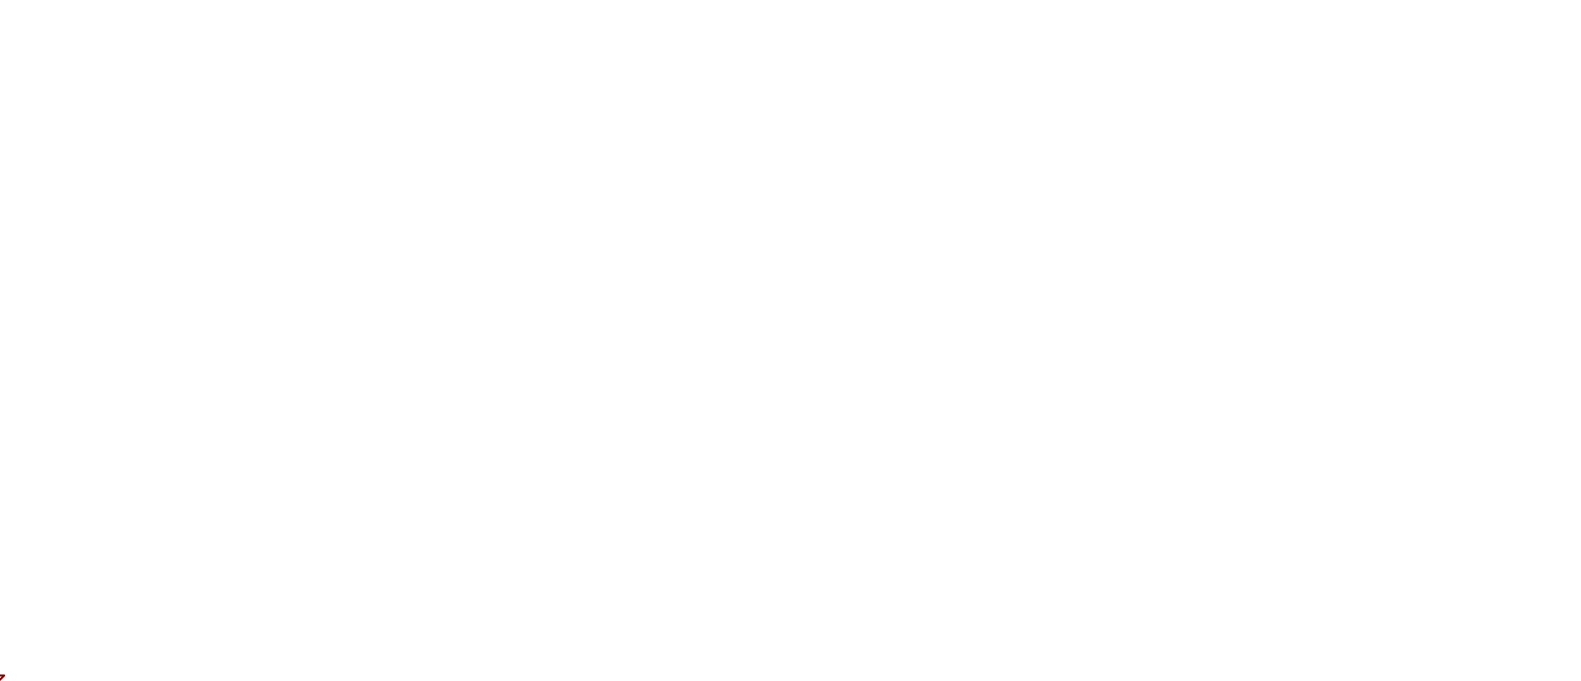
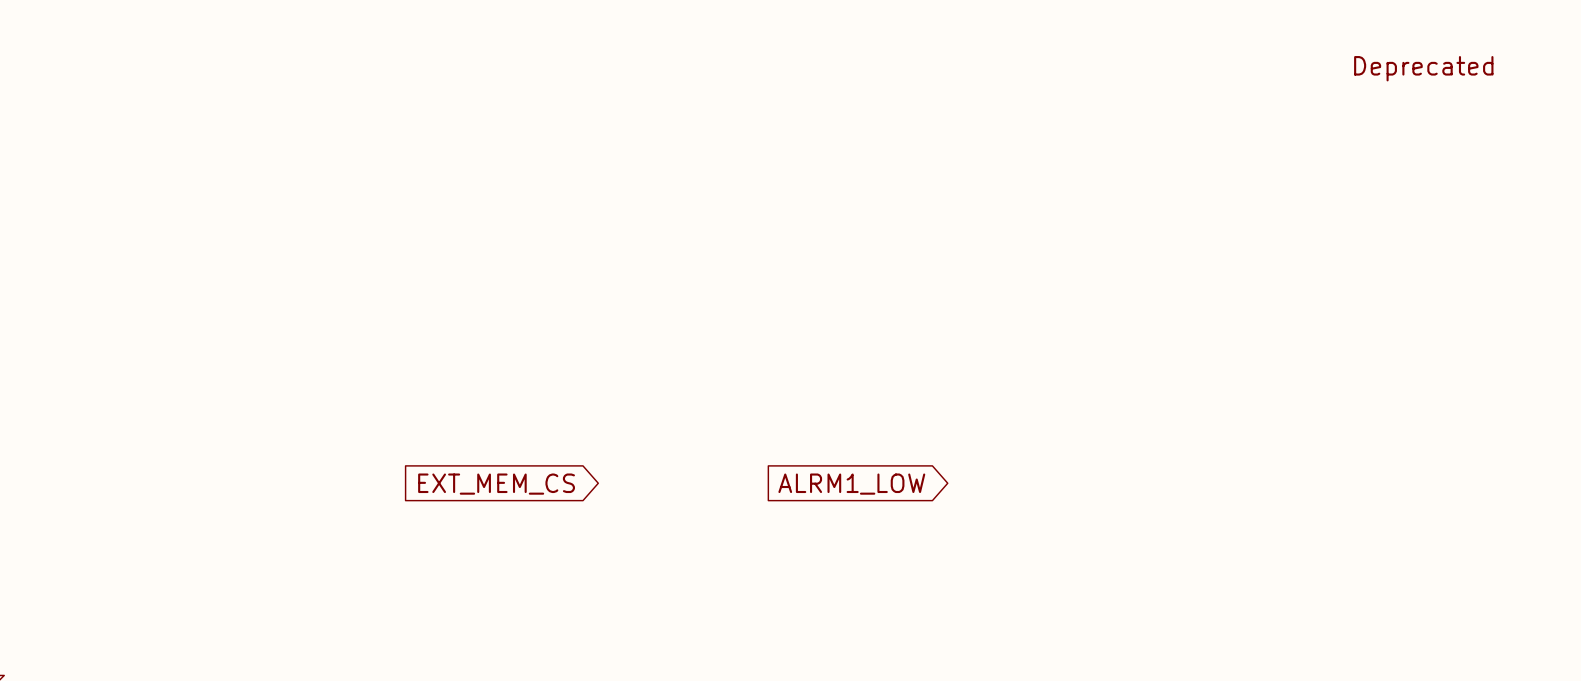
label: none -> Deprecated (1423, 68)
global label: none -> EXT_MEM_CS (496, 484)
global label: none -> ALRM1_LOW (851, 484)

